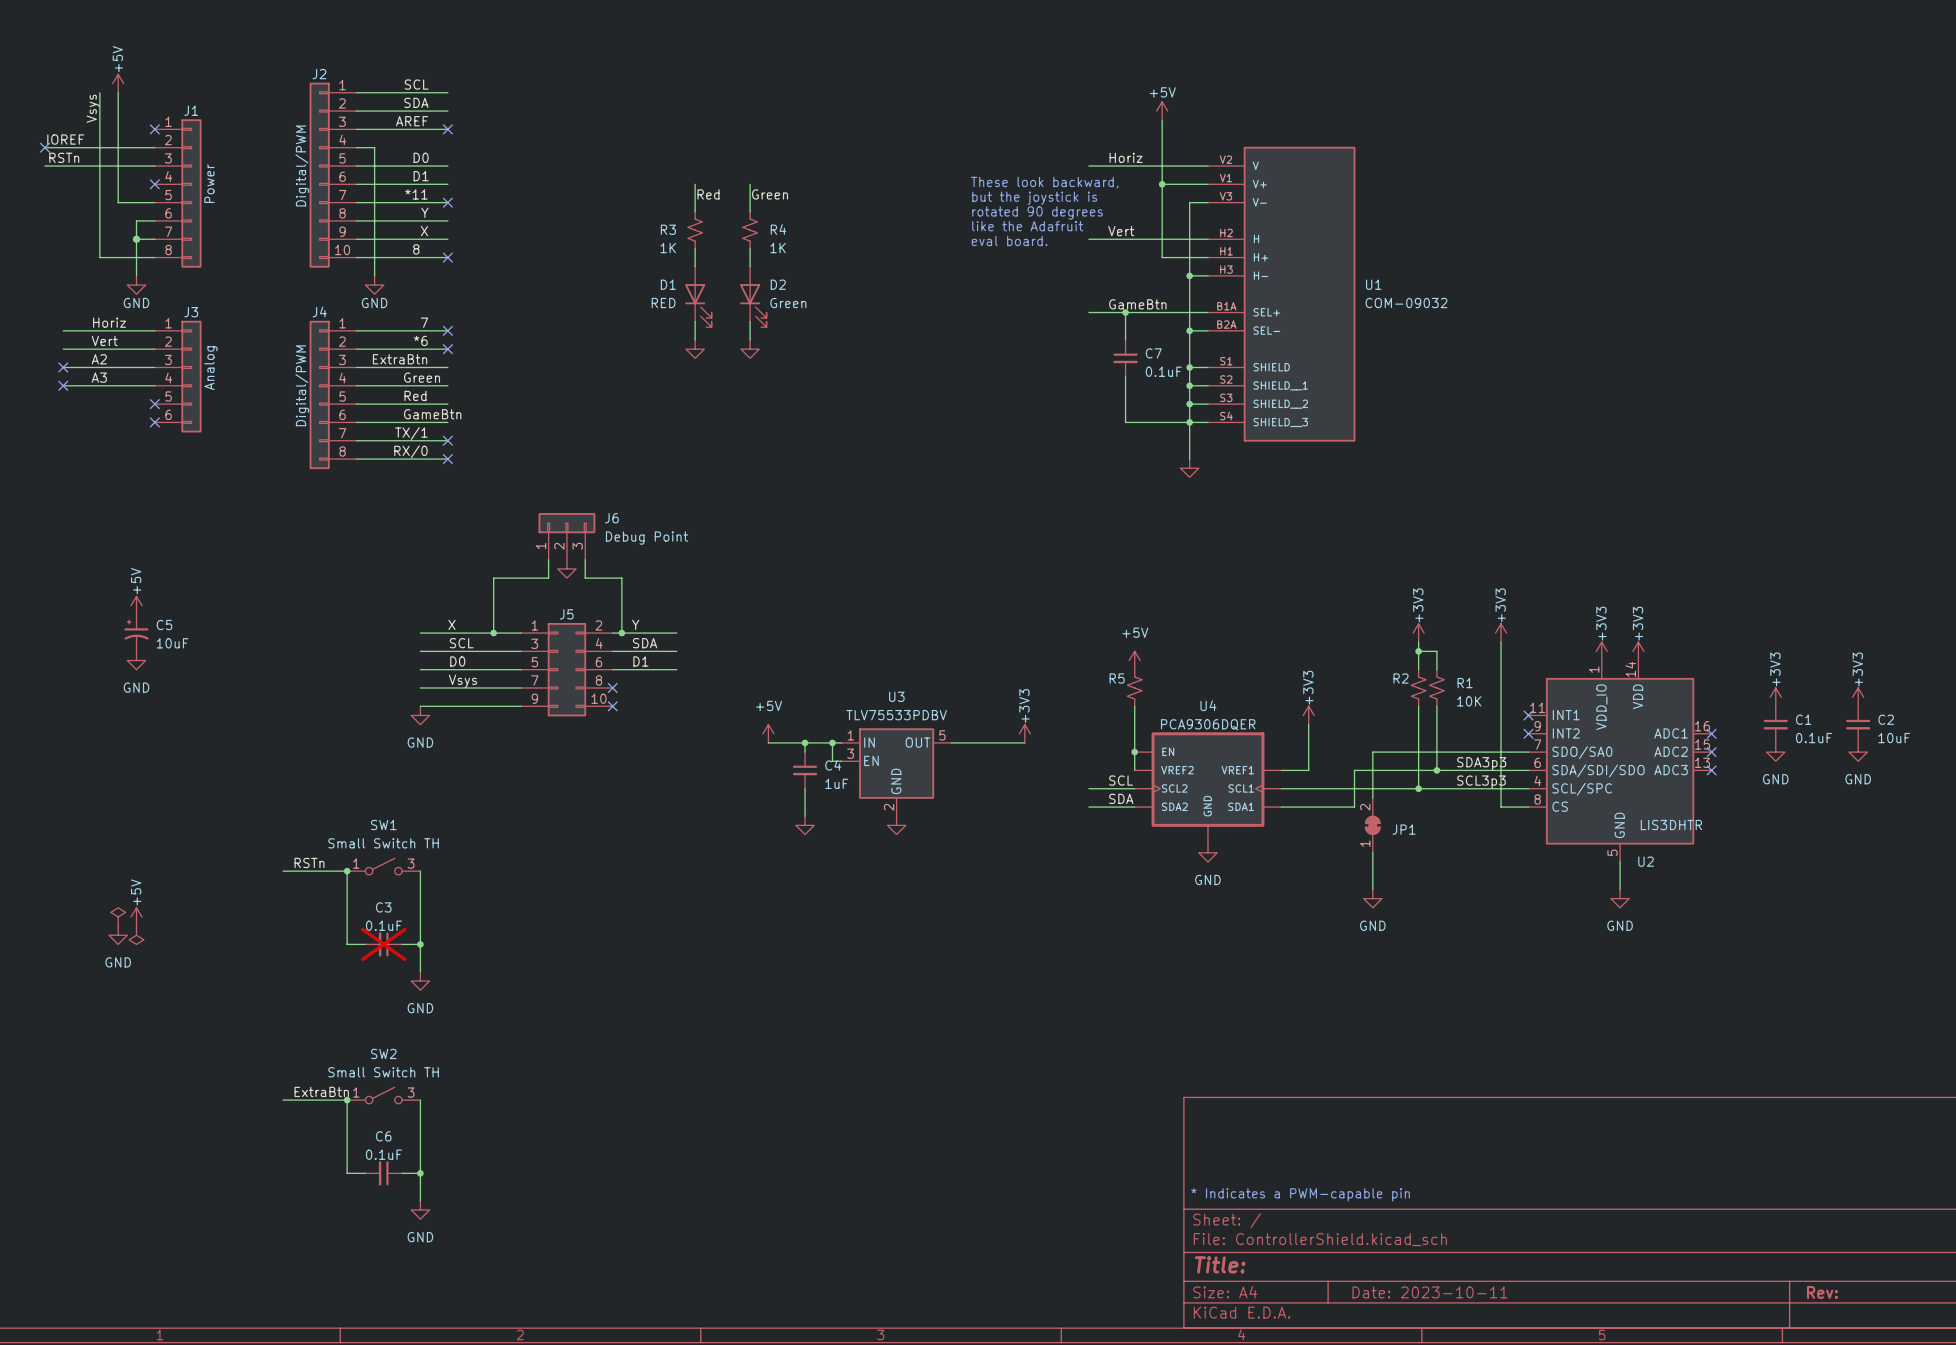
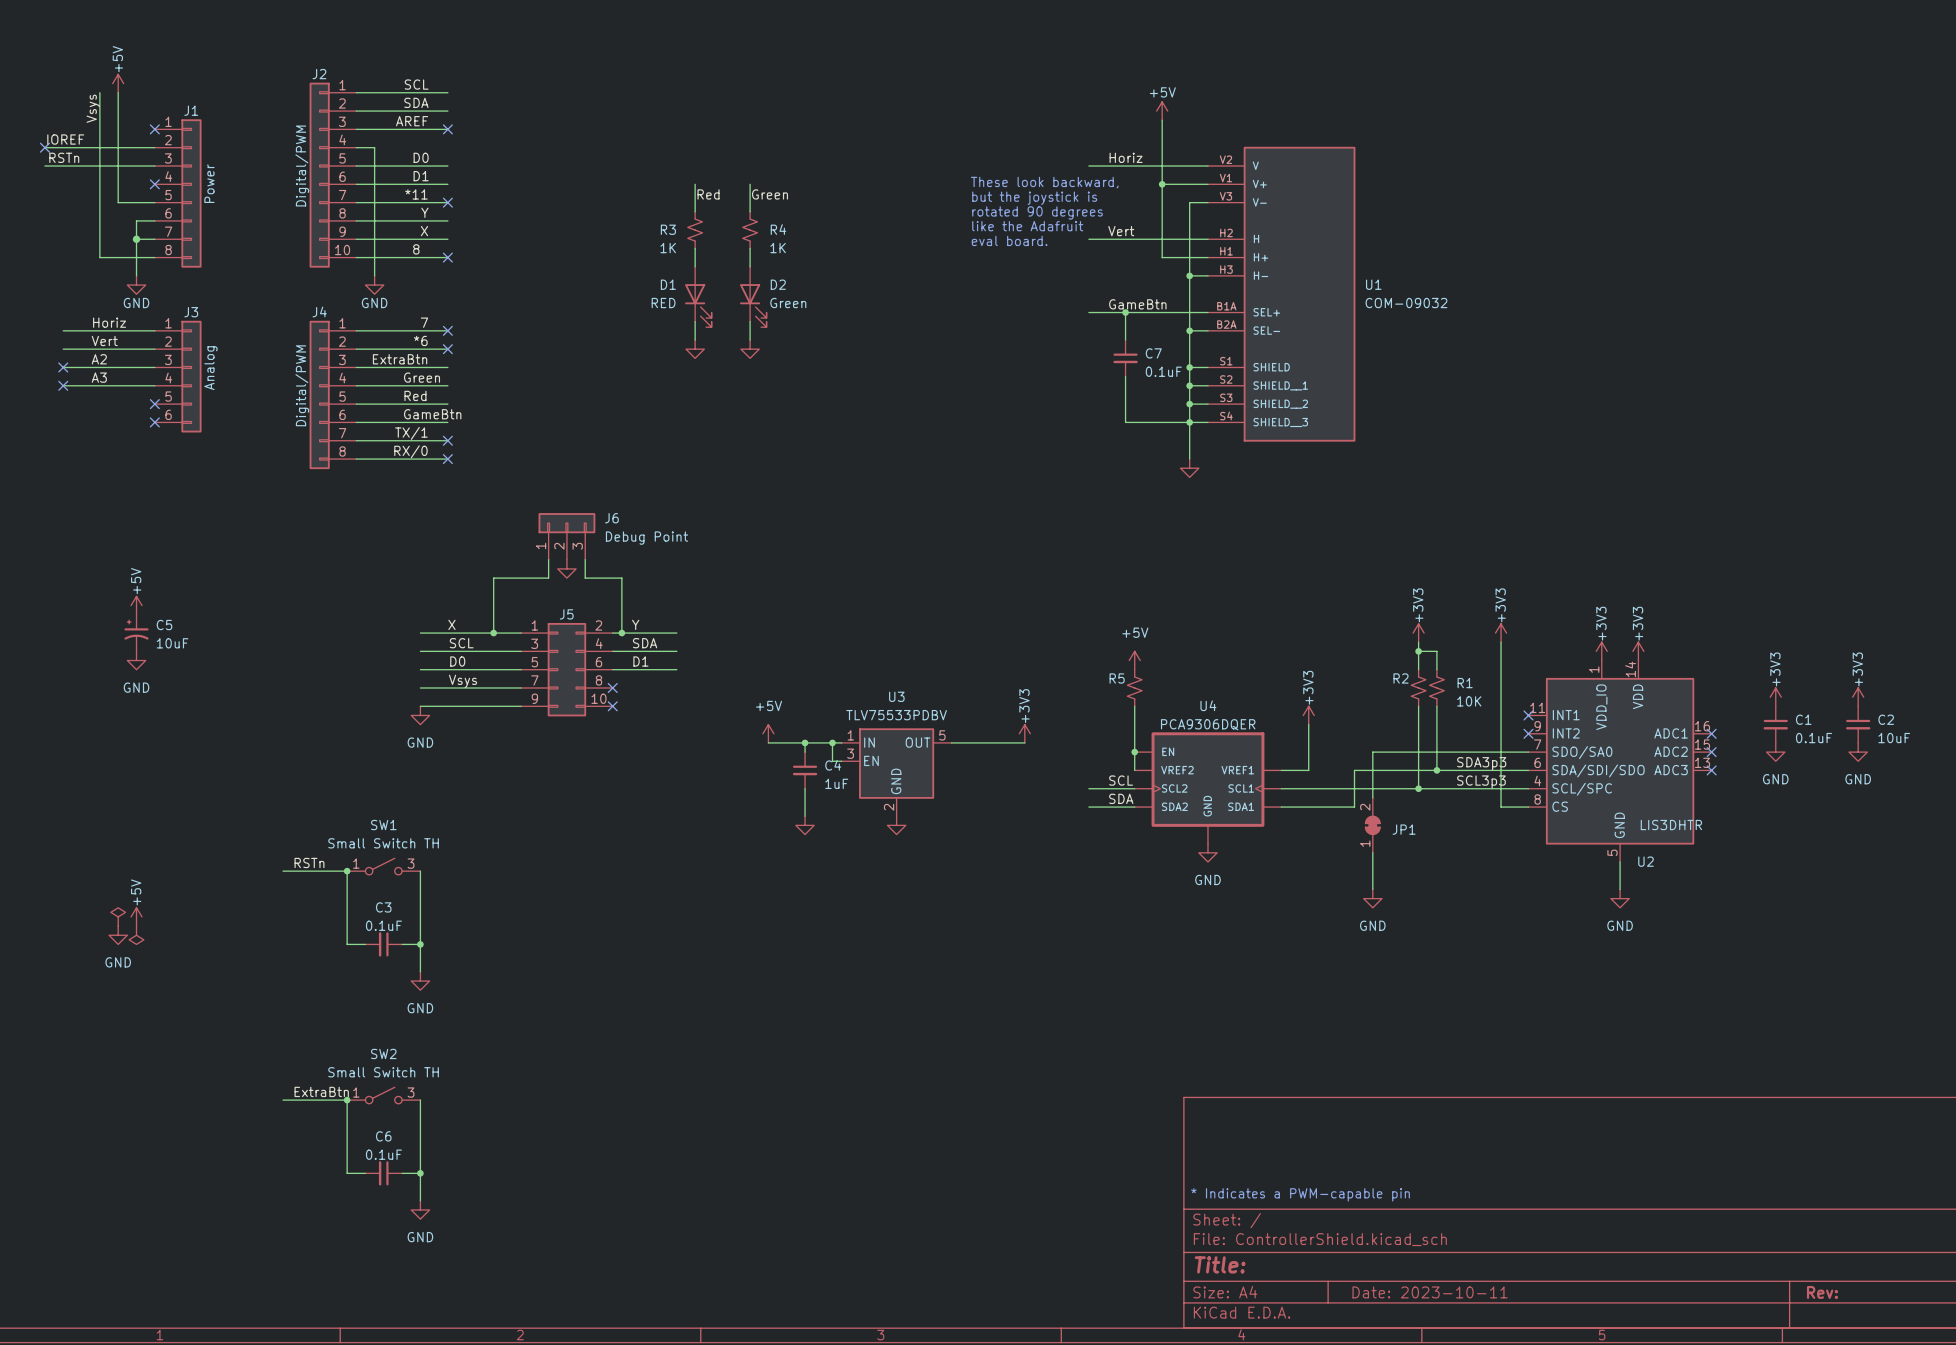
C3 do-not-place cross: (383, 944) -> none

